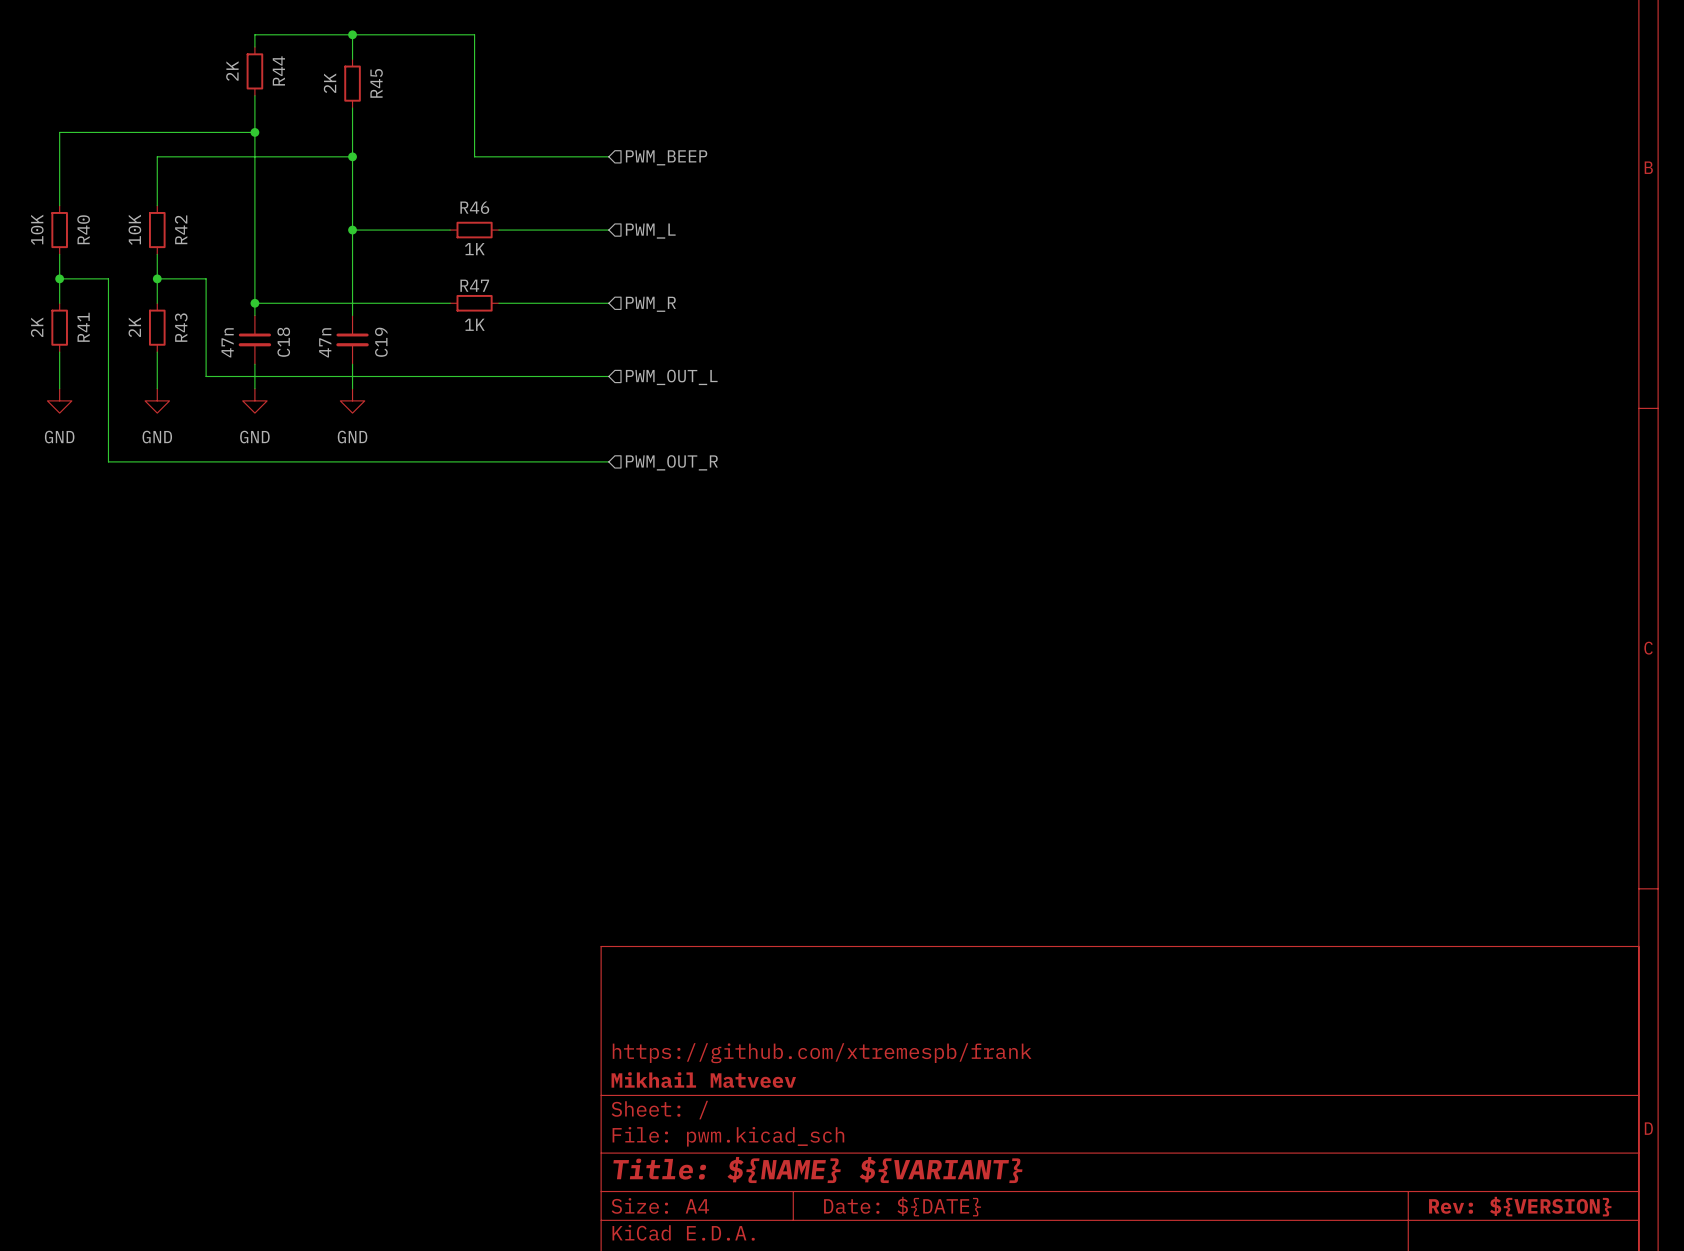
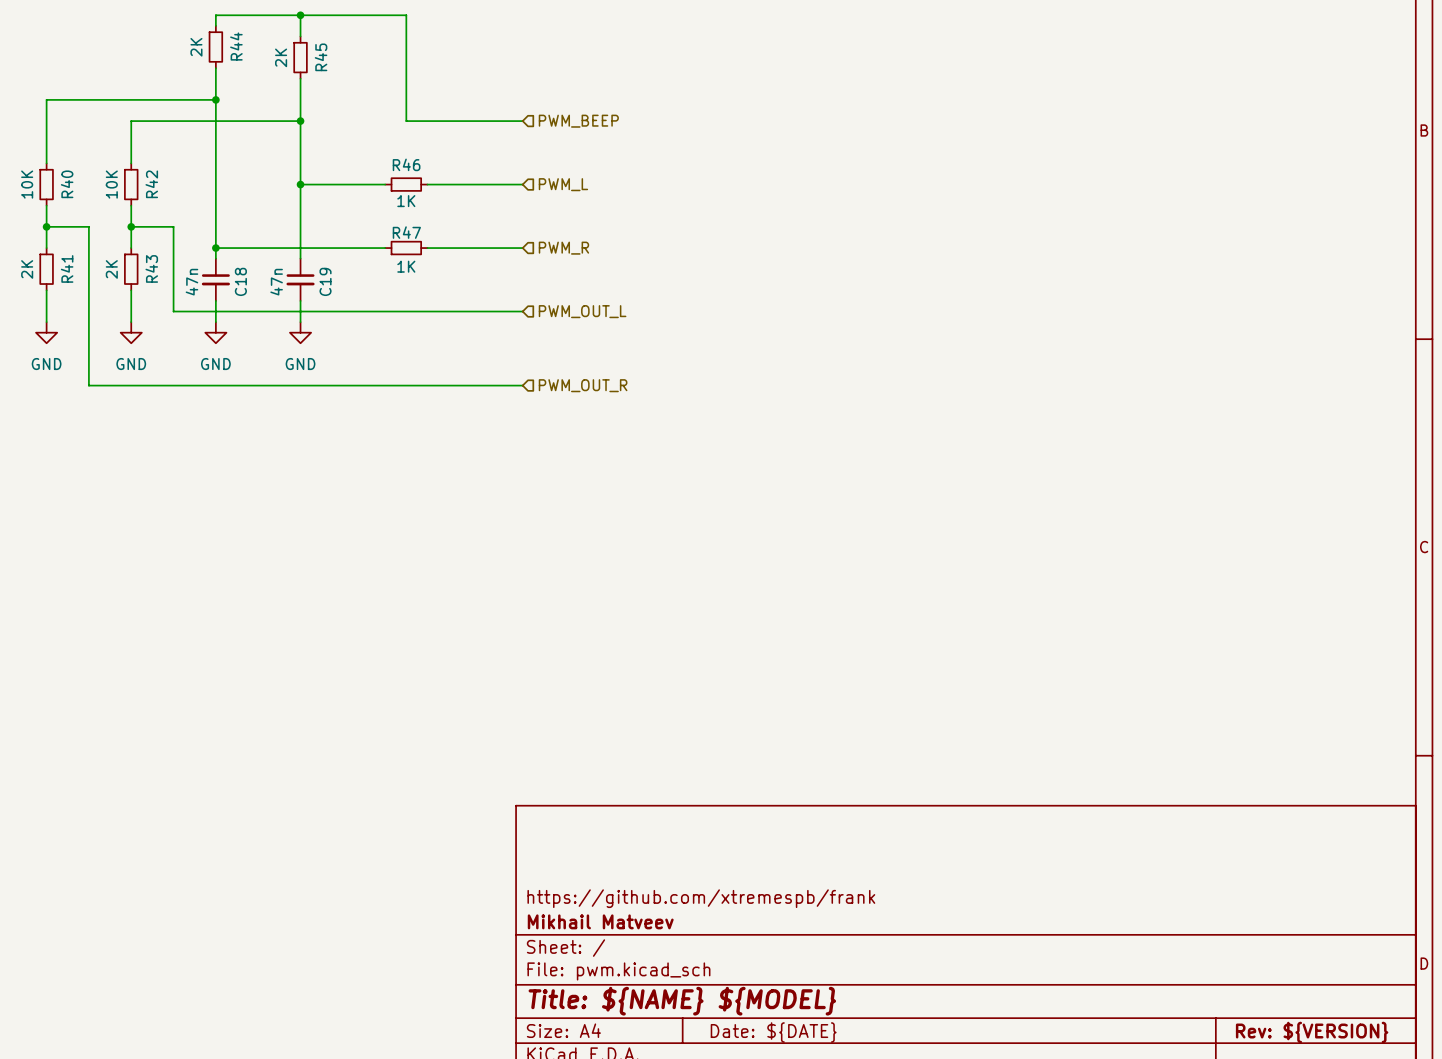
title block: Title: ${NAME} ${VARIANT} (817, 1170) -> Title: ${NAME} ${MODEL} (682, 1001)

